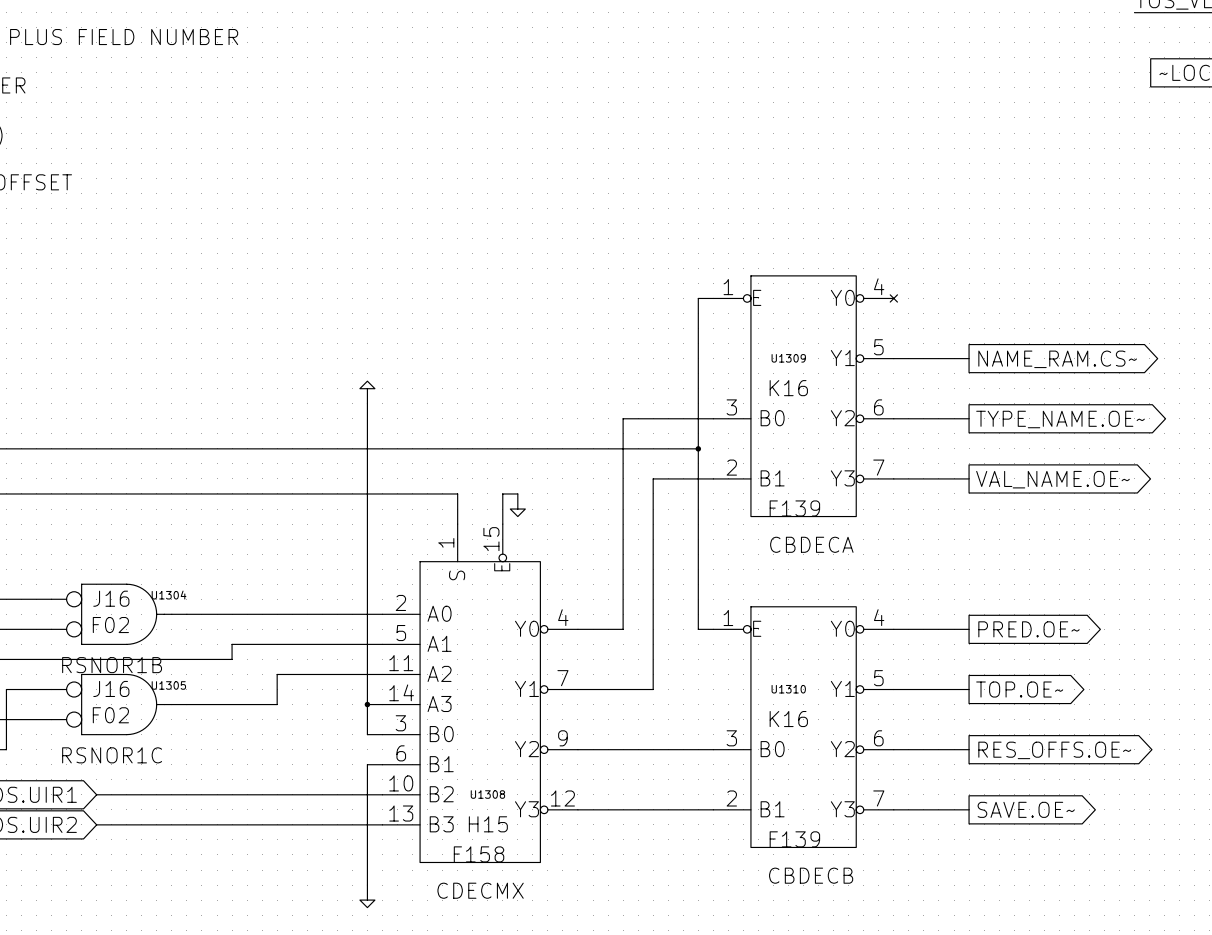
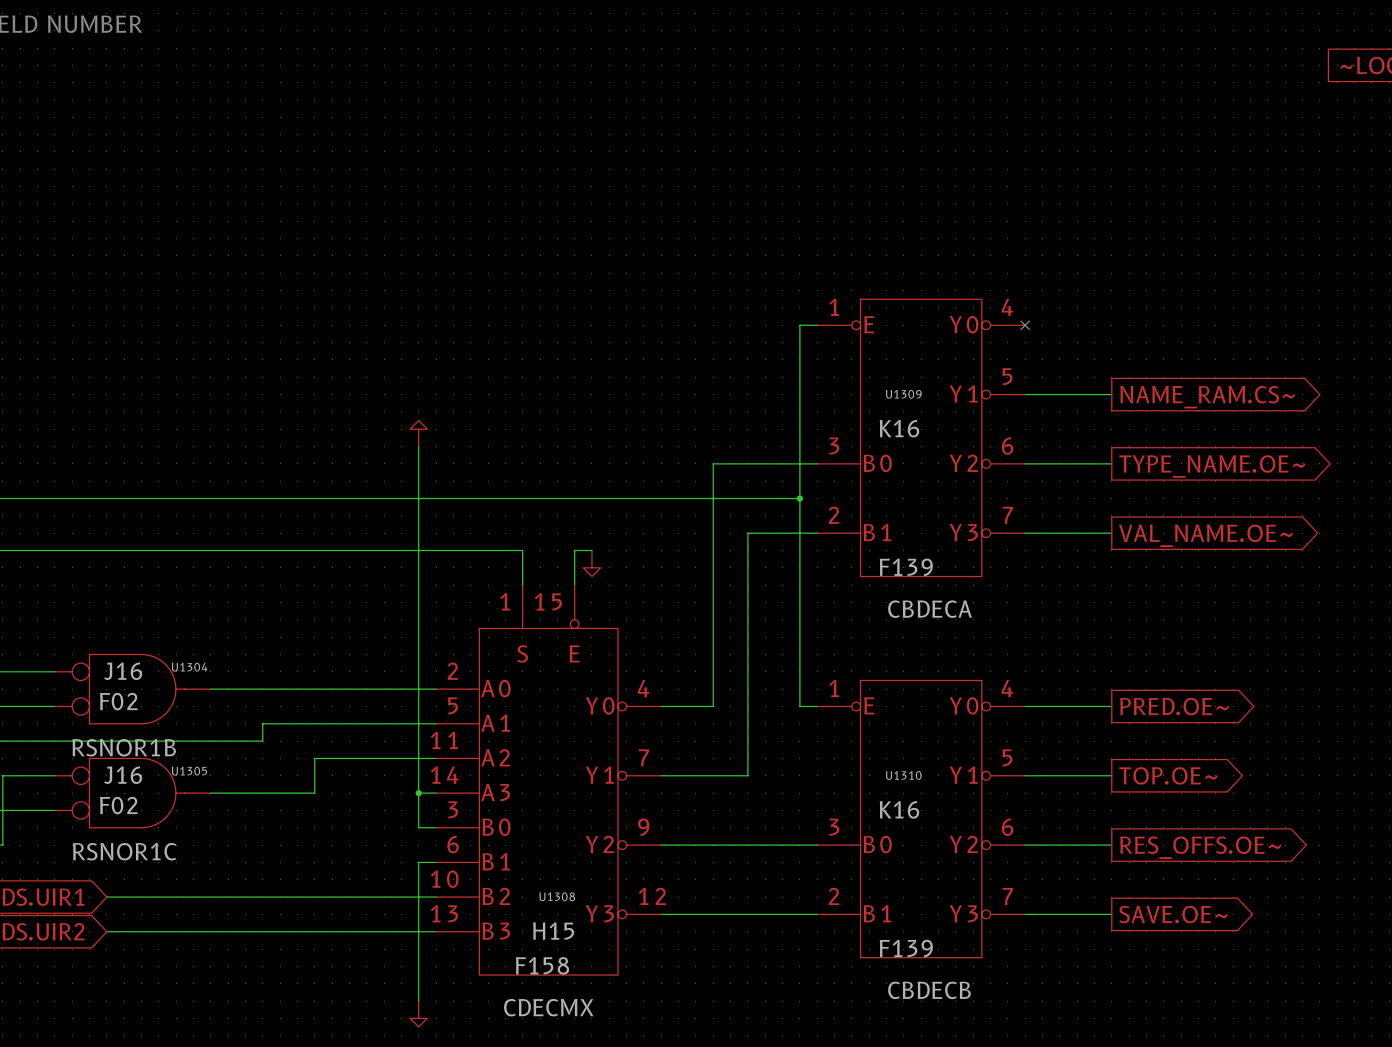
U1309 symbol: [713, 275, 894, 517] -> [817, 299, 1026, 577]
U1308 symbol: [382, 524, 578, 863] -> [436, 585, 662, 976]
U1310 symbol: [713, 606, 894, 848] -> [817, 680, 1026, 958]

